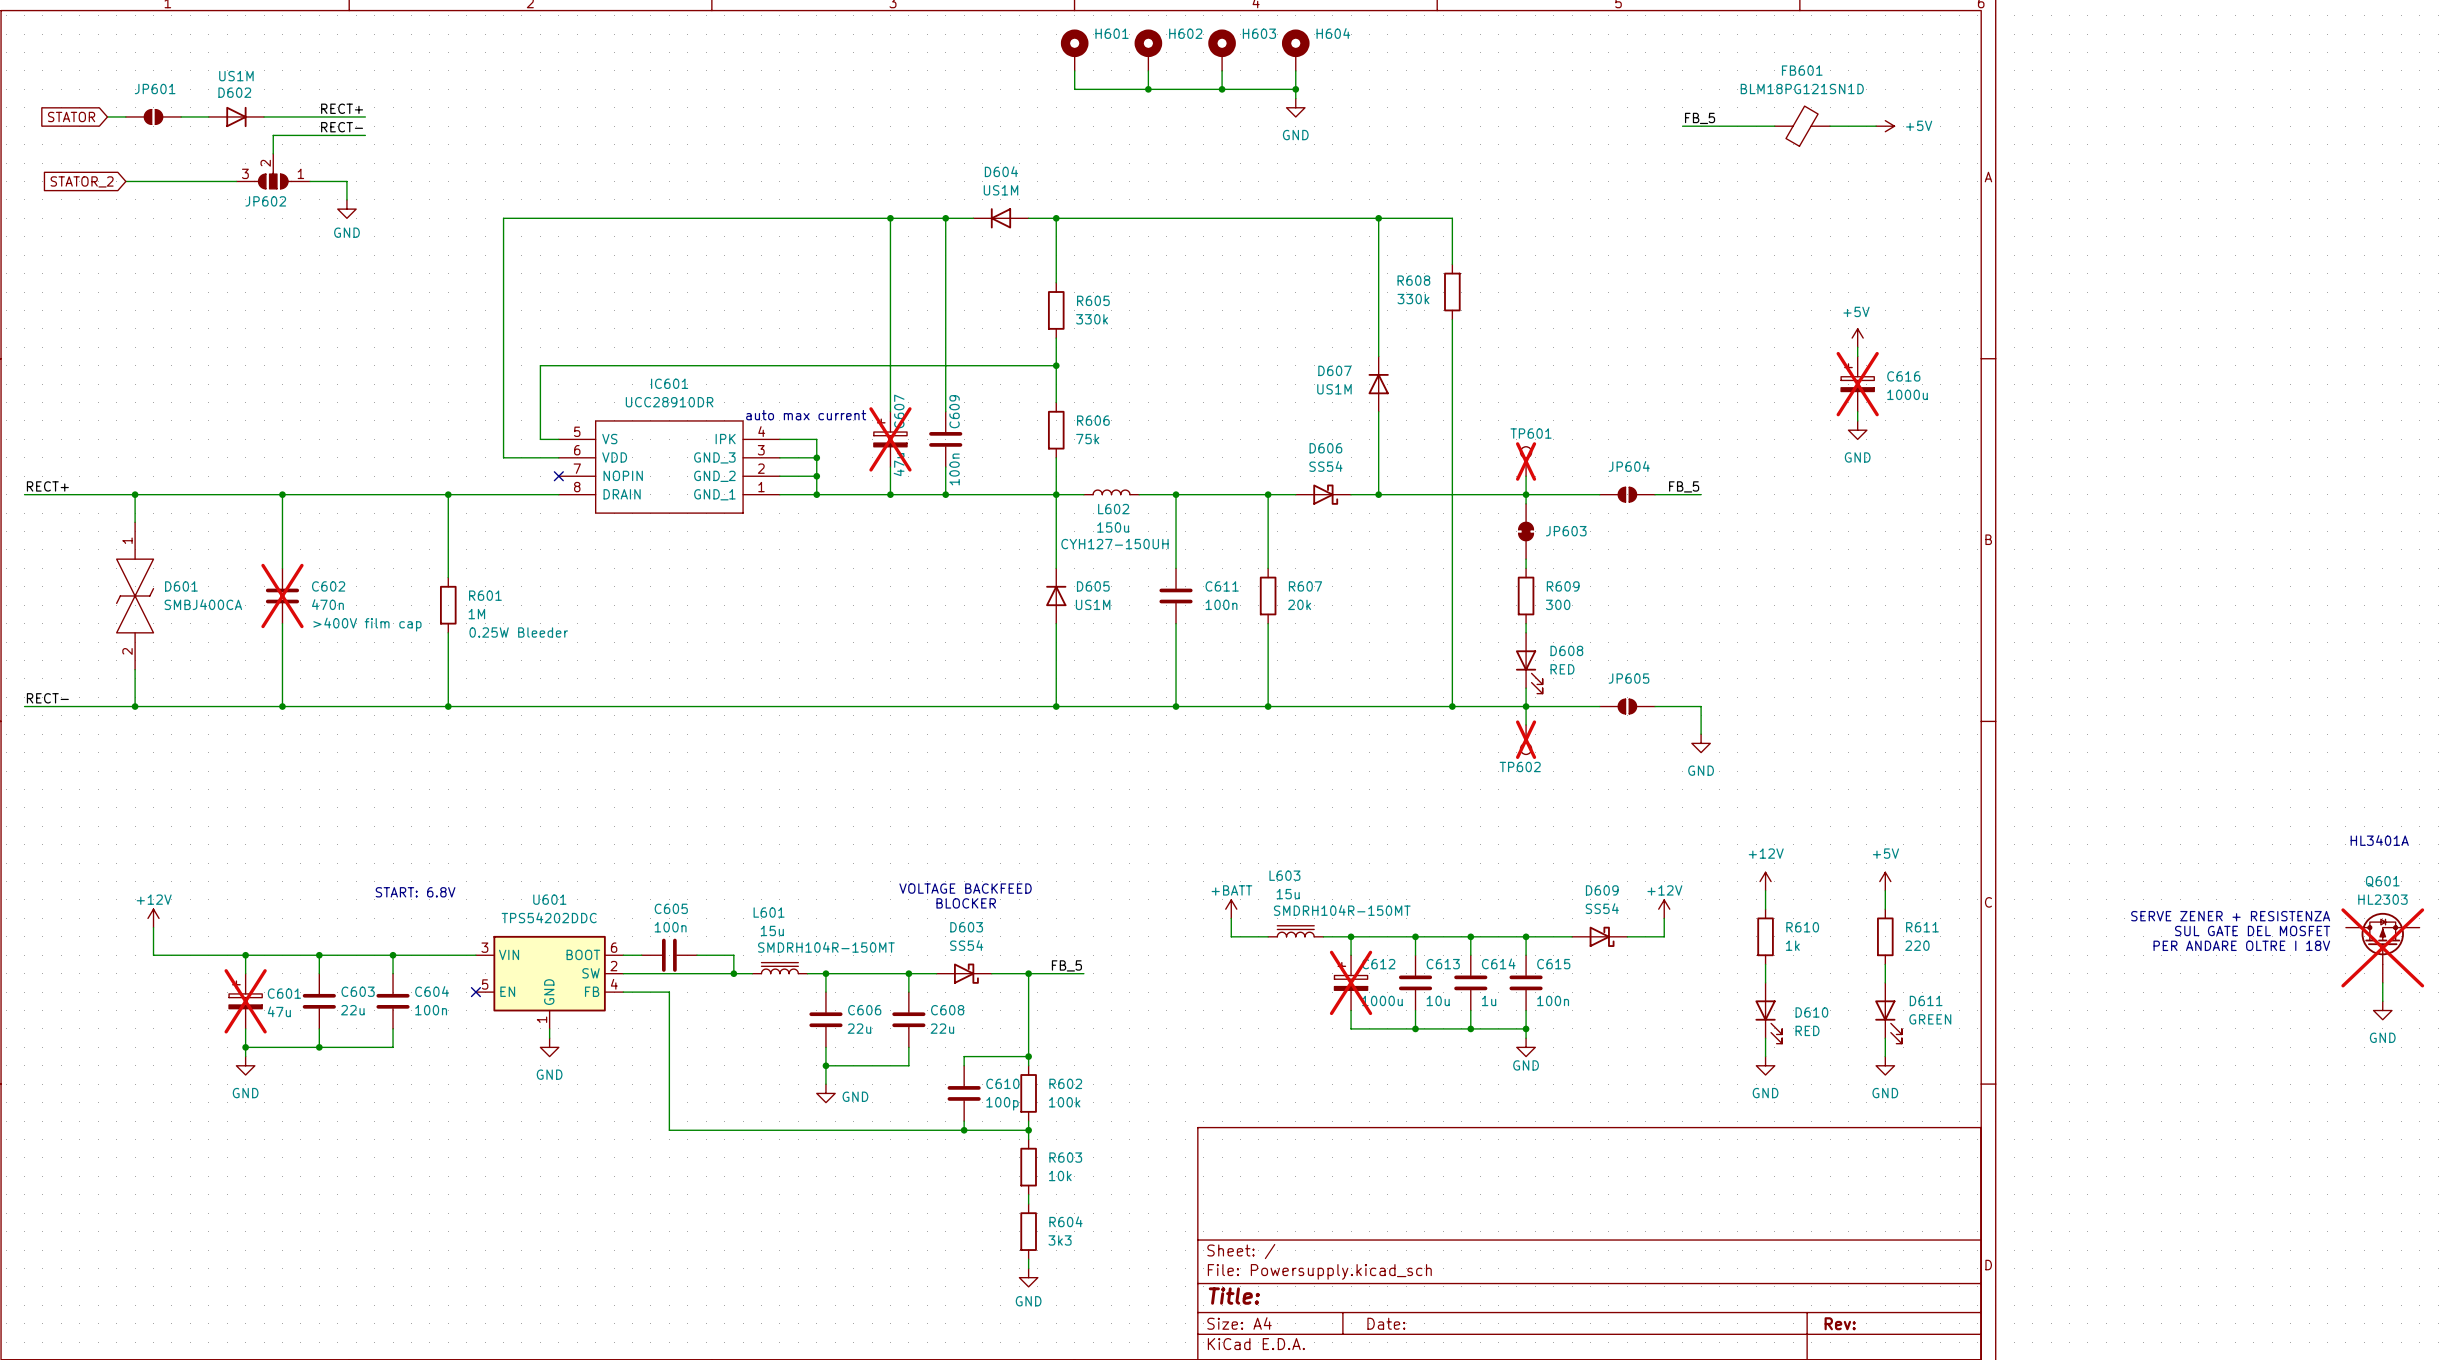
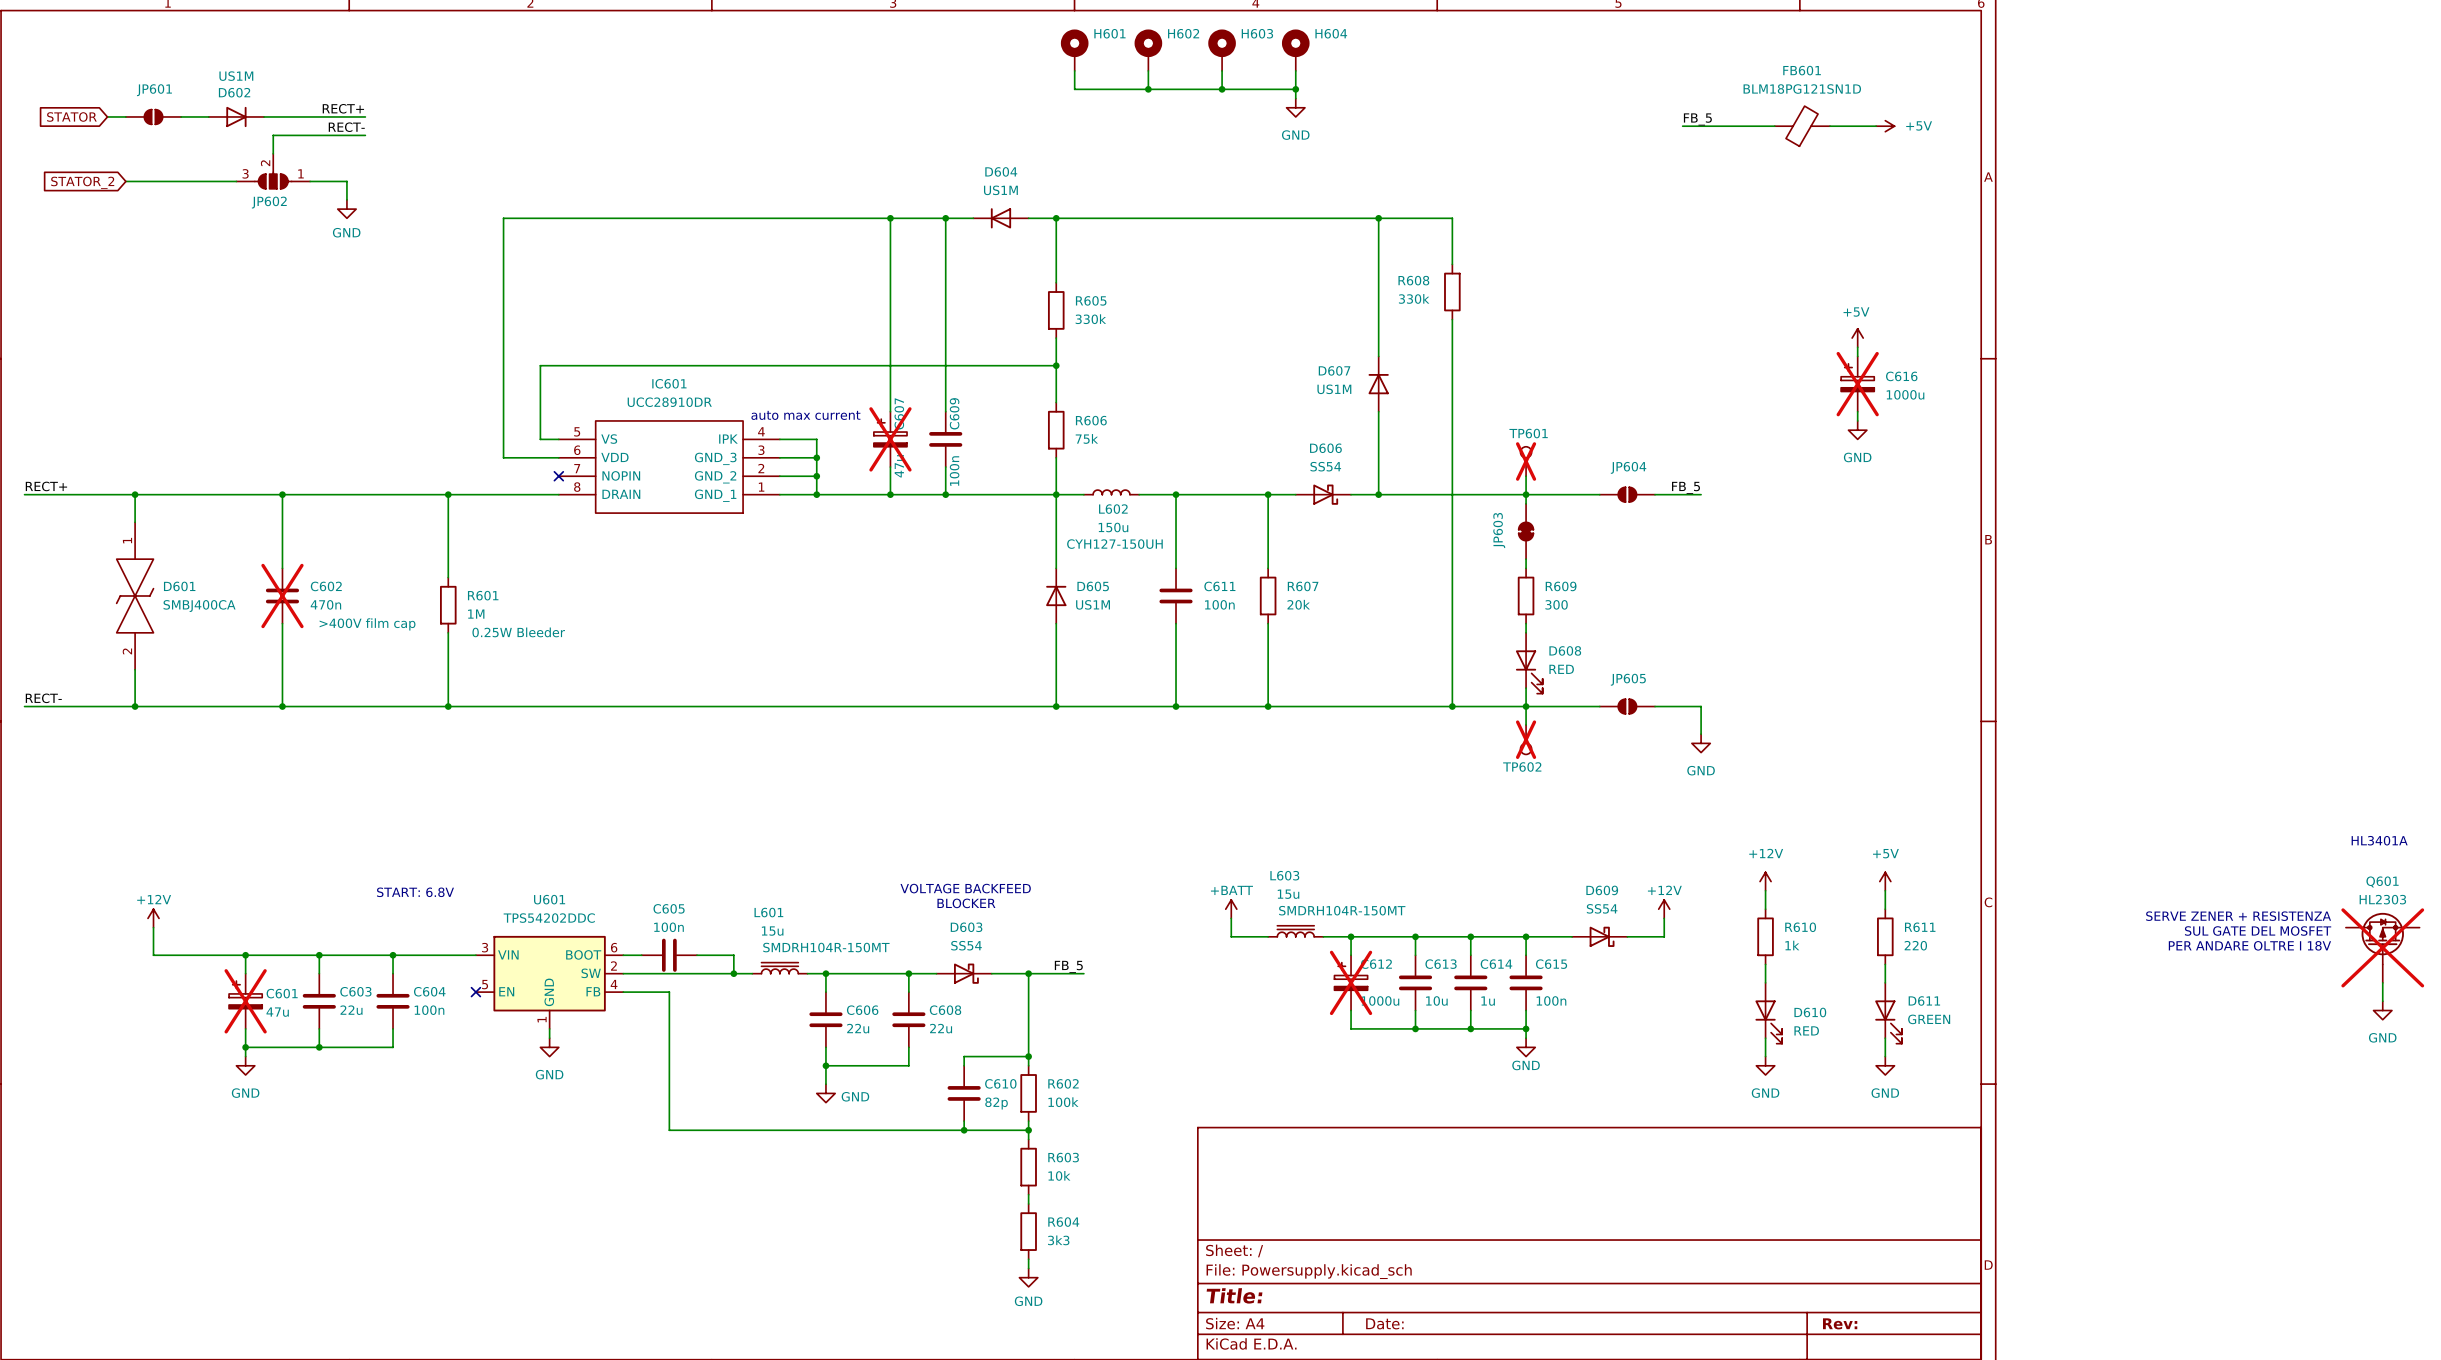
JP603 name rotation: 0° (1566, 531) -> 90° counterclockwise (1499, 530)
JP603 name position: JP603 (1566, 531) -> JP603 (1499, 530)
C610 value: 100p (1002, 1103) -> 82p (996, 1103)

